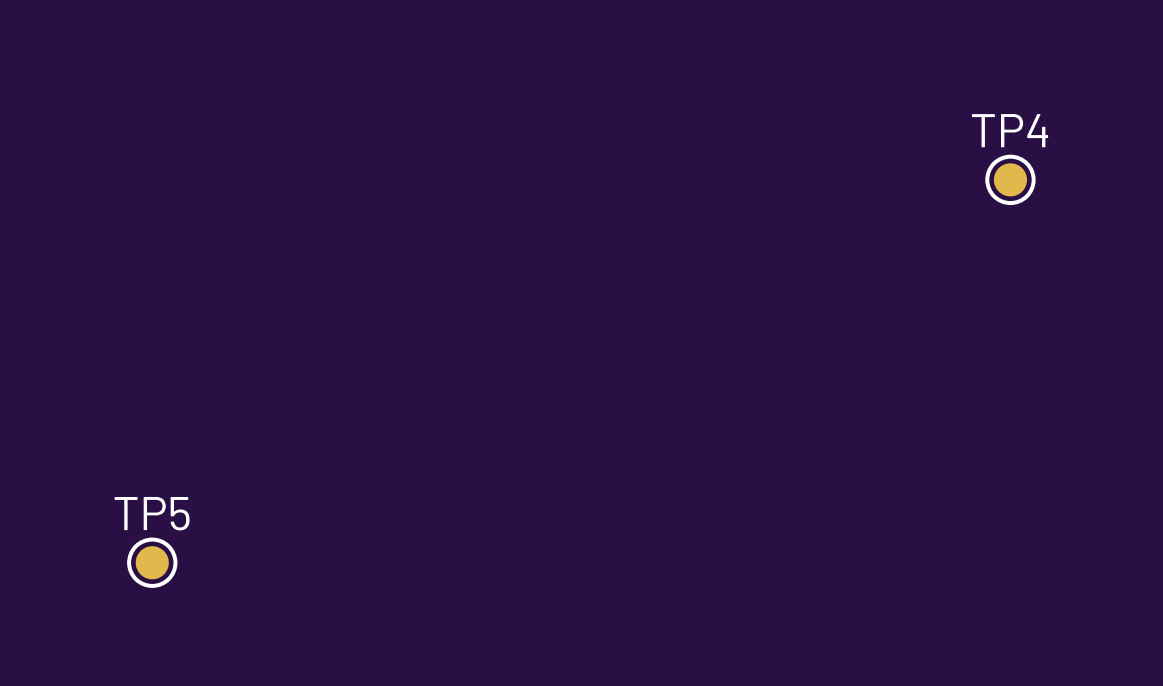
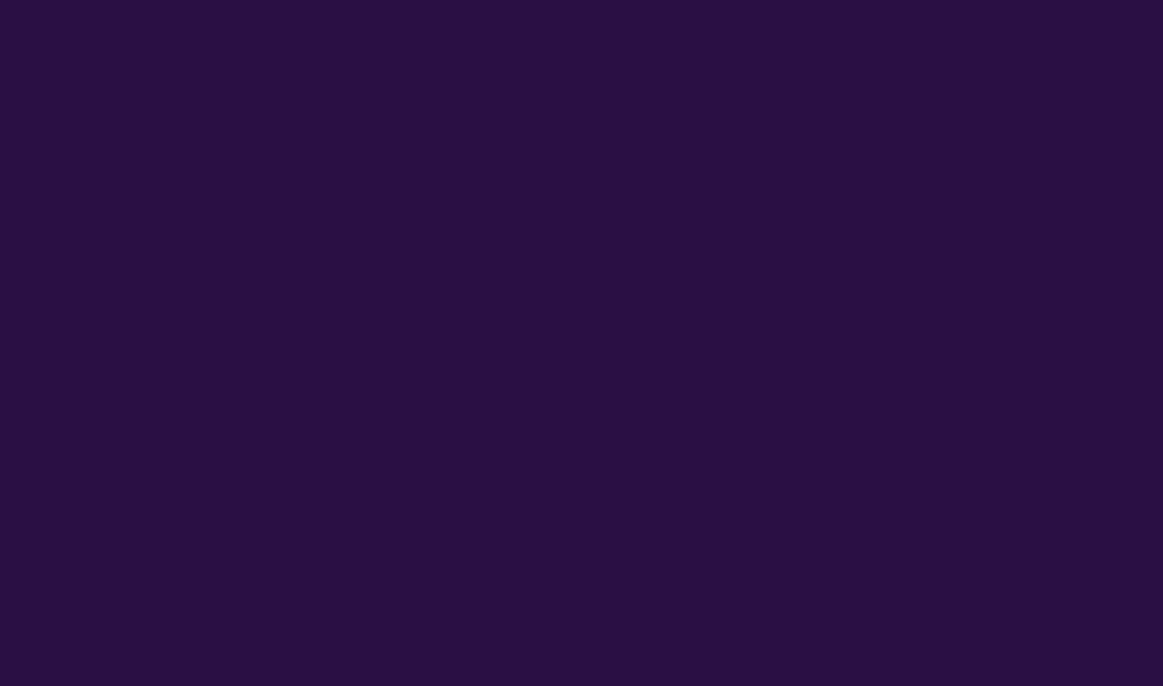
TP4: (1010, 179) -> none
TP5: (152, 562) -> none

